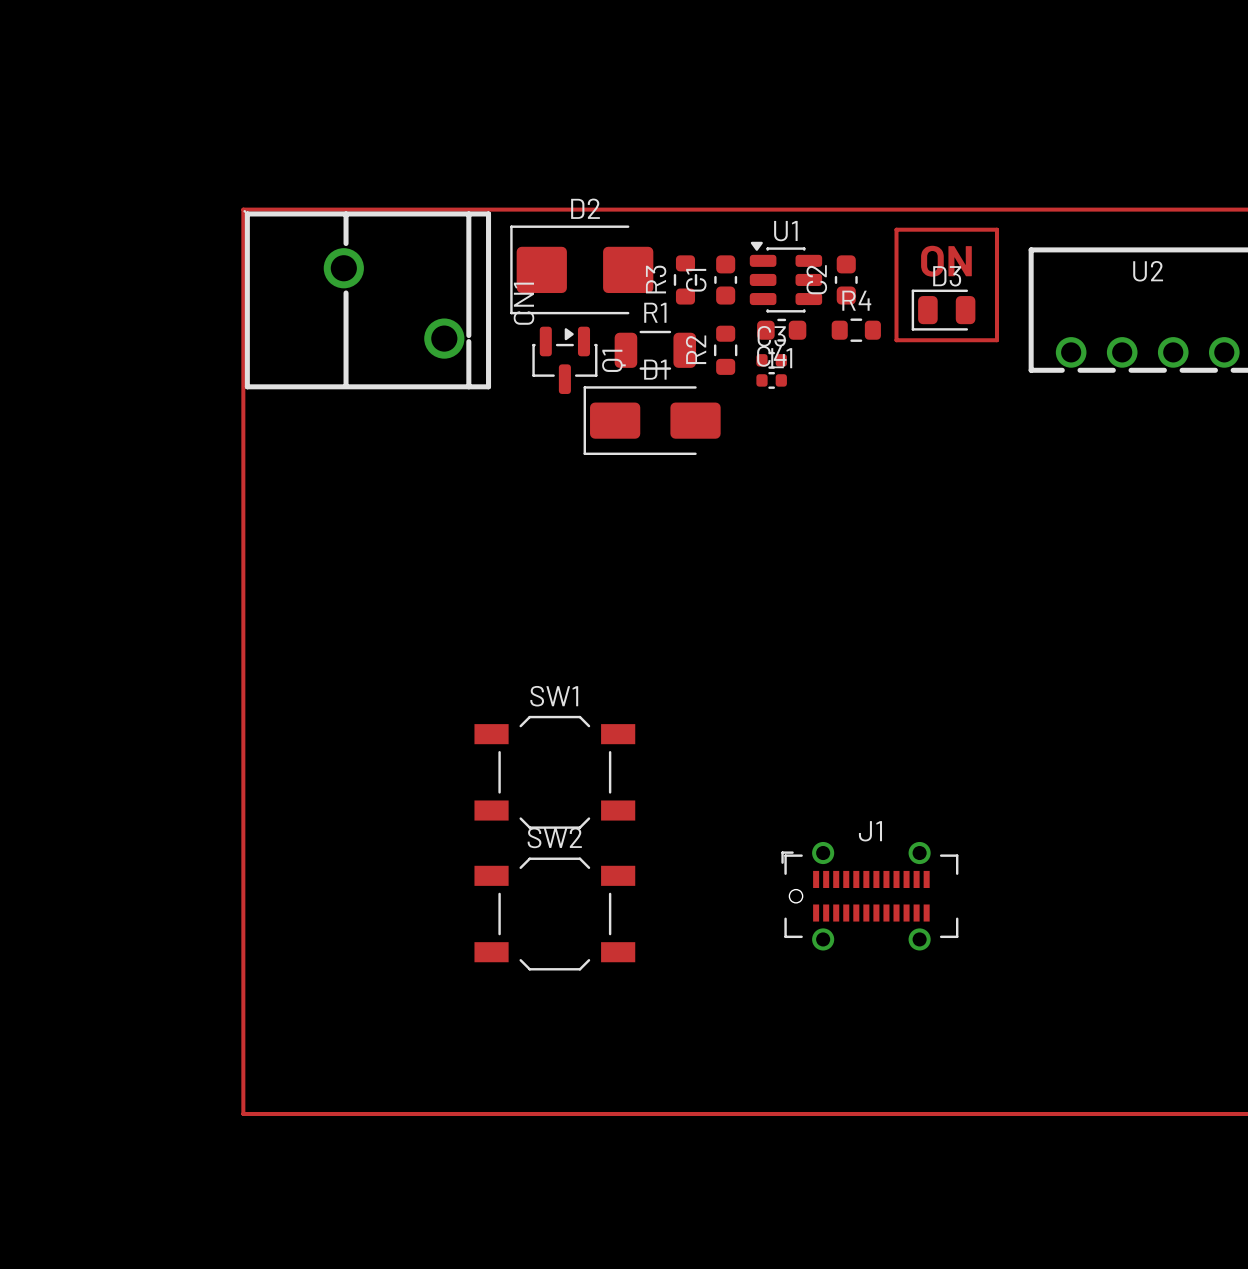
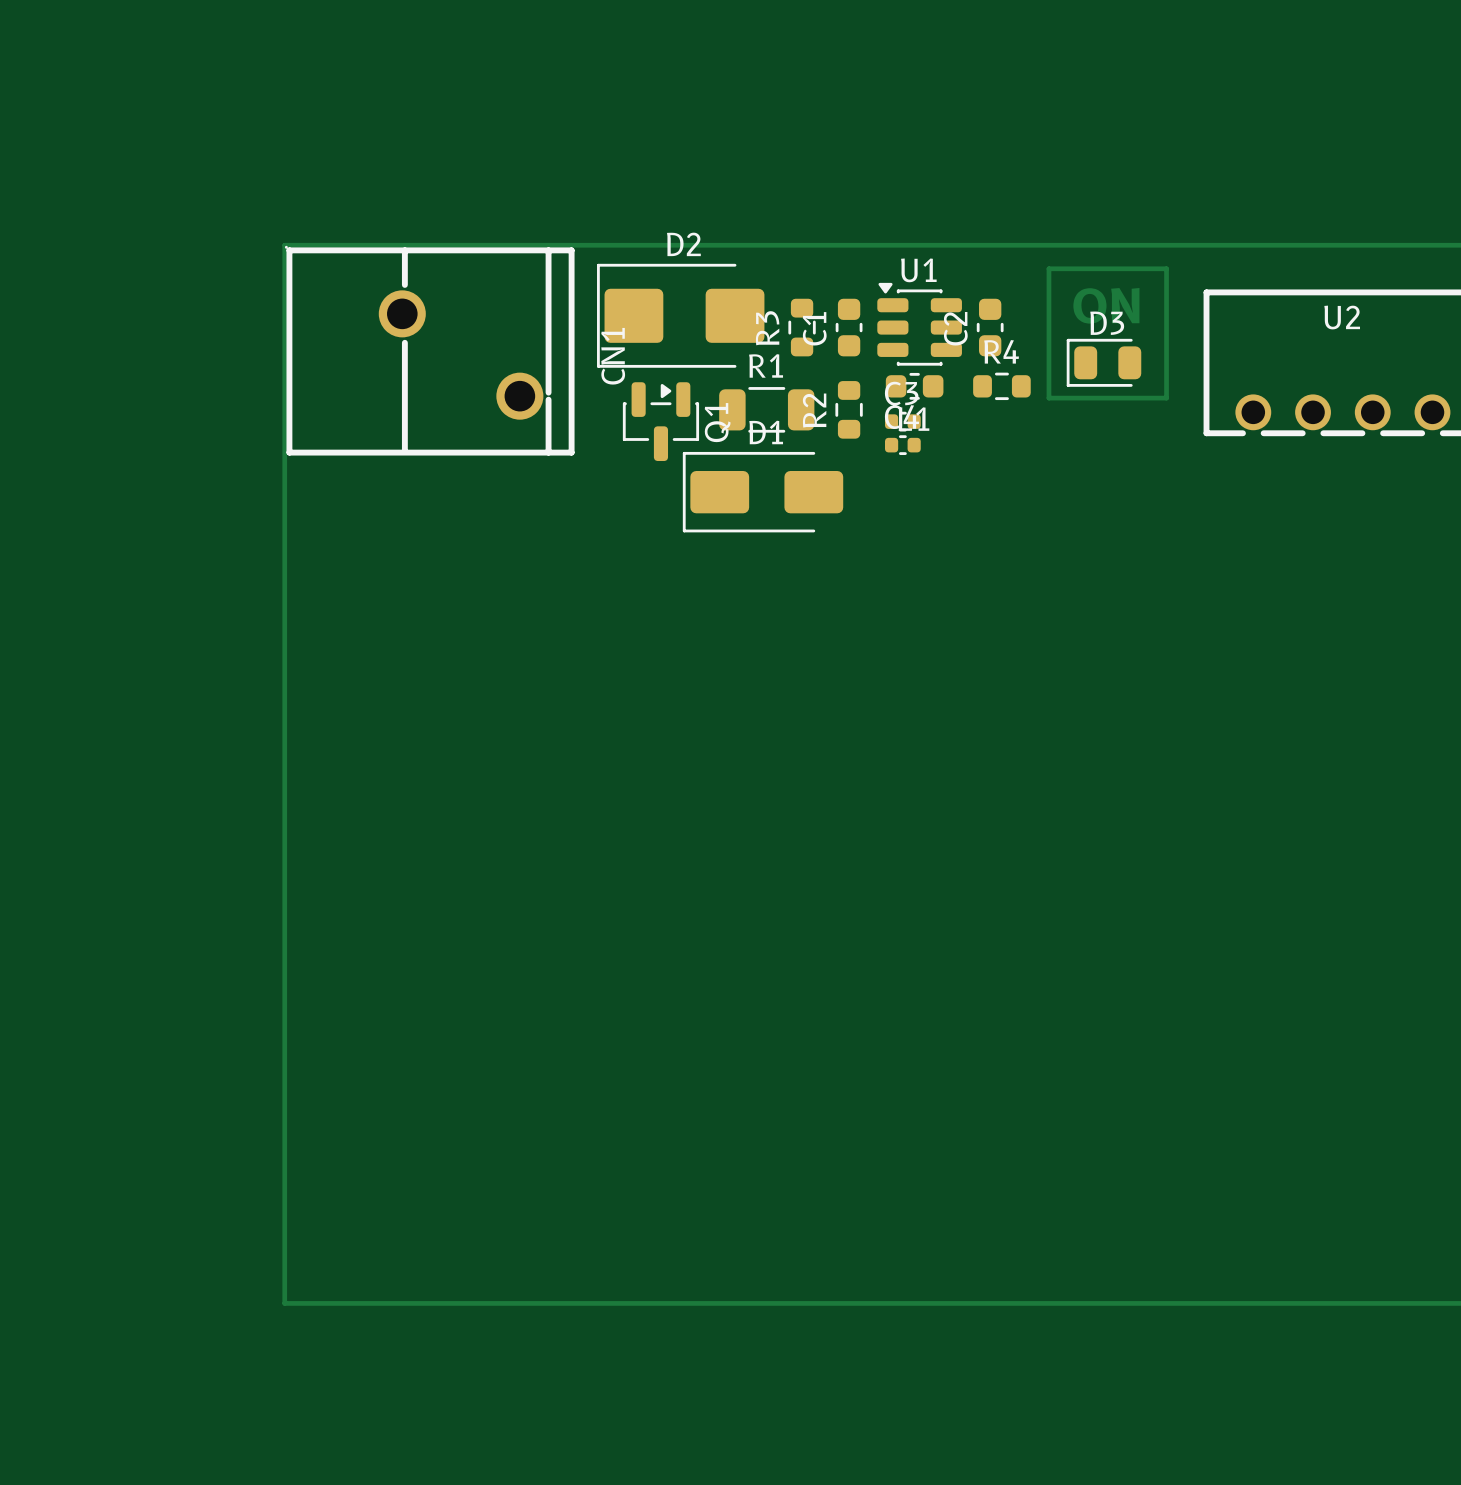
SW1: (554, 772) -> none
J1: (869, 896) -> none
SW2: (554, 914) -> none

